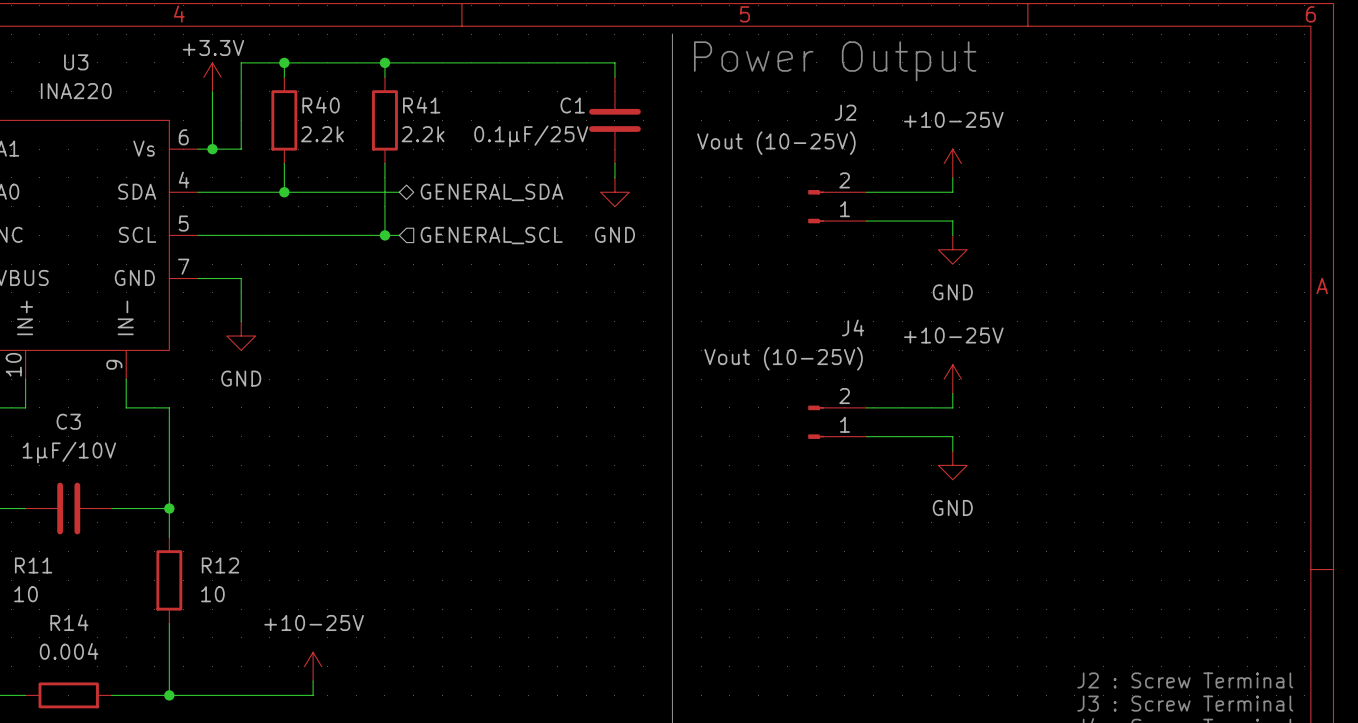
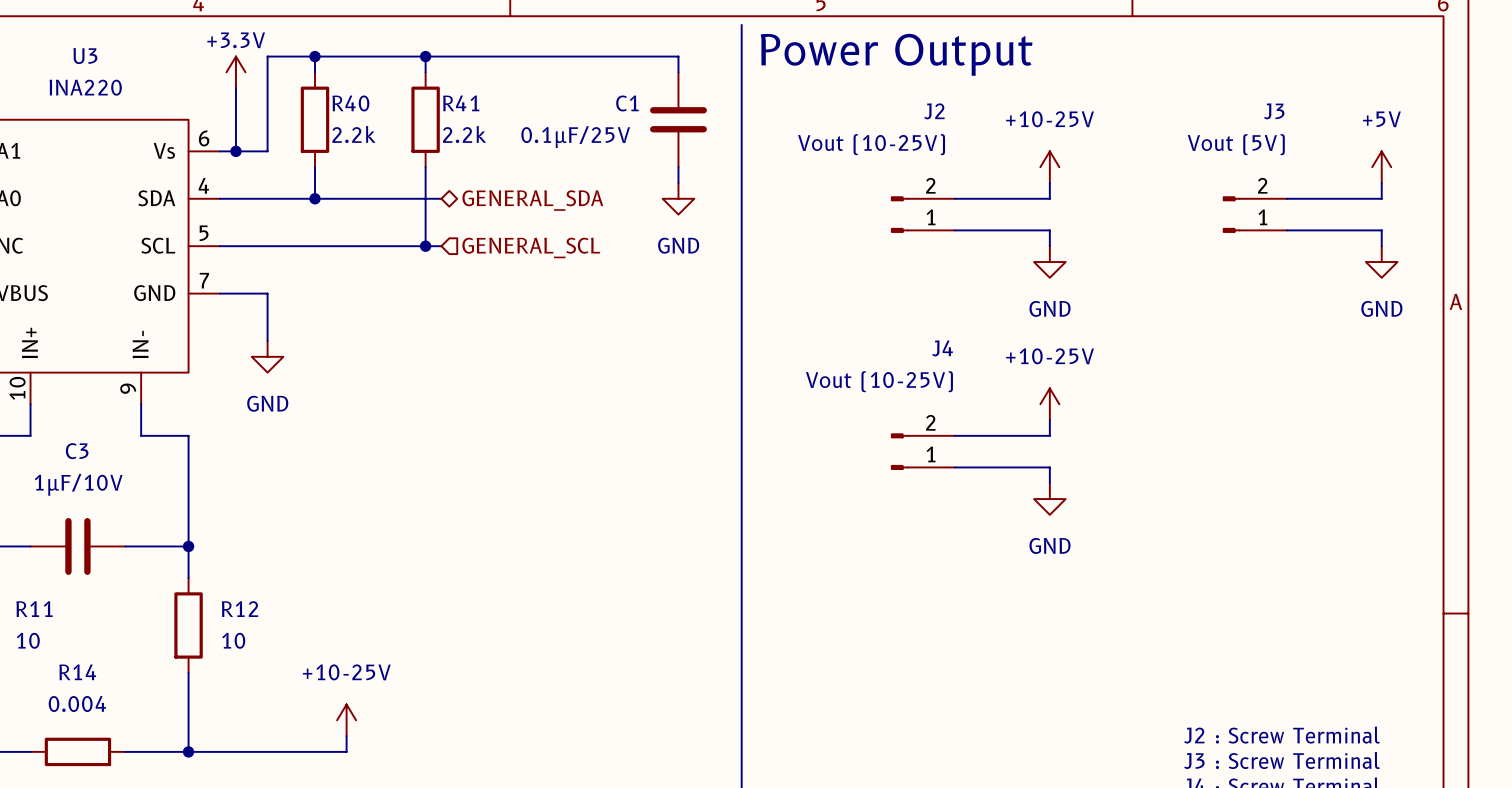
power symbol: none -> +5V (1381, 167)
wire: none -> (1381, 182) (1381, 198) (1286, 198)
J3: none -> Vout (5V) (1254, 214)
wire: none -> (1286, 230) (1381, 230) (1381, 246)
power symbol: none -> GND (1381, 262)

